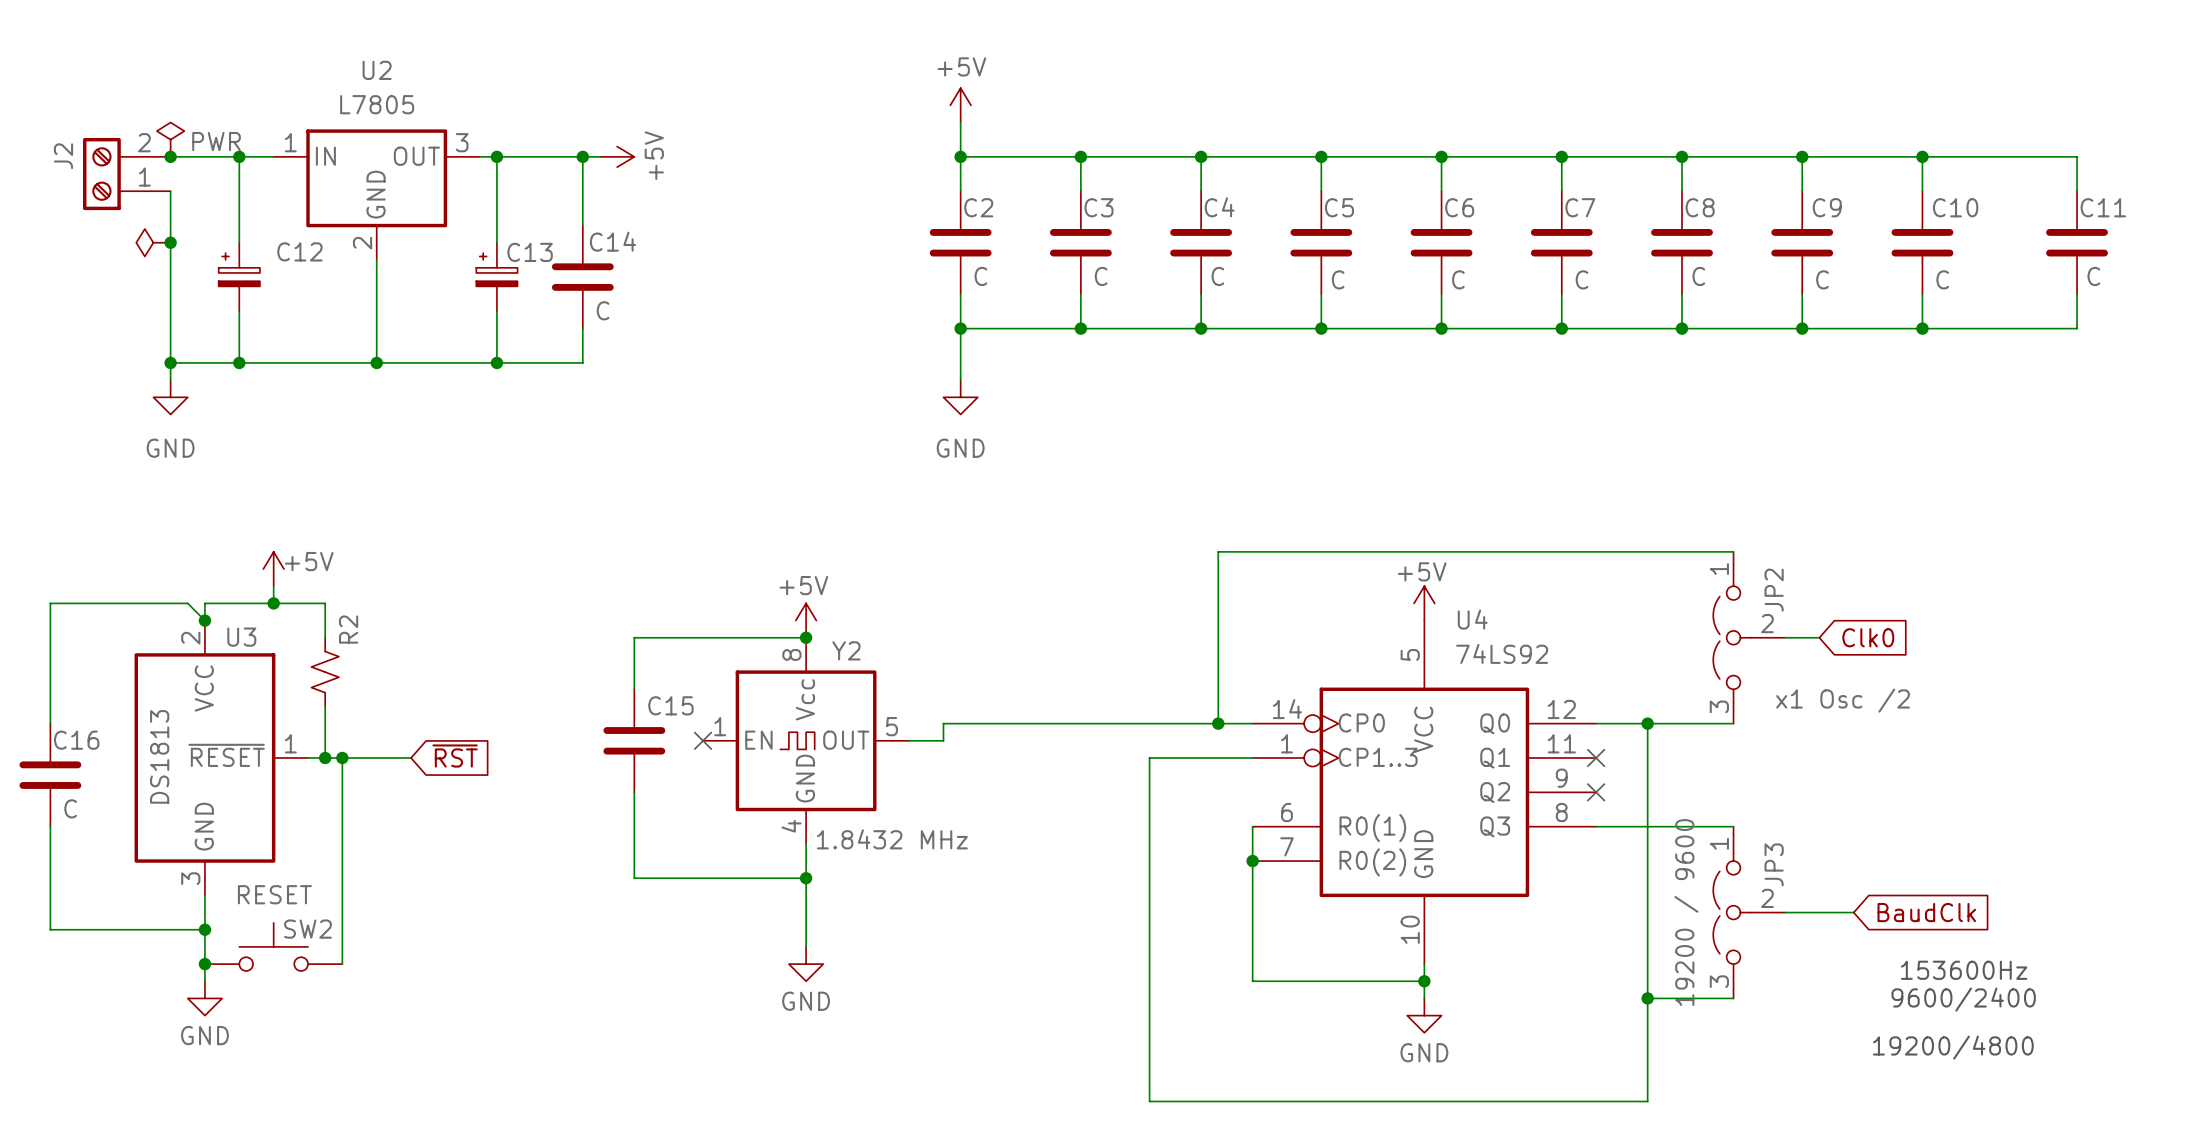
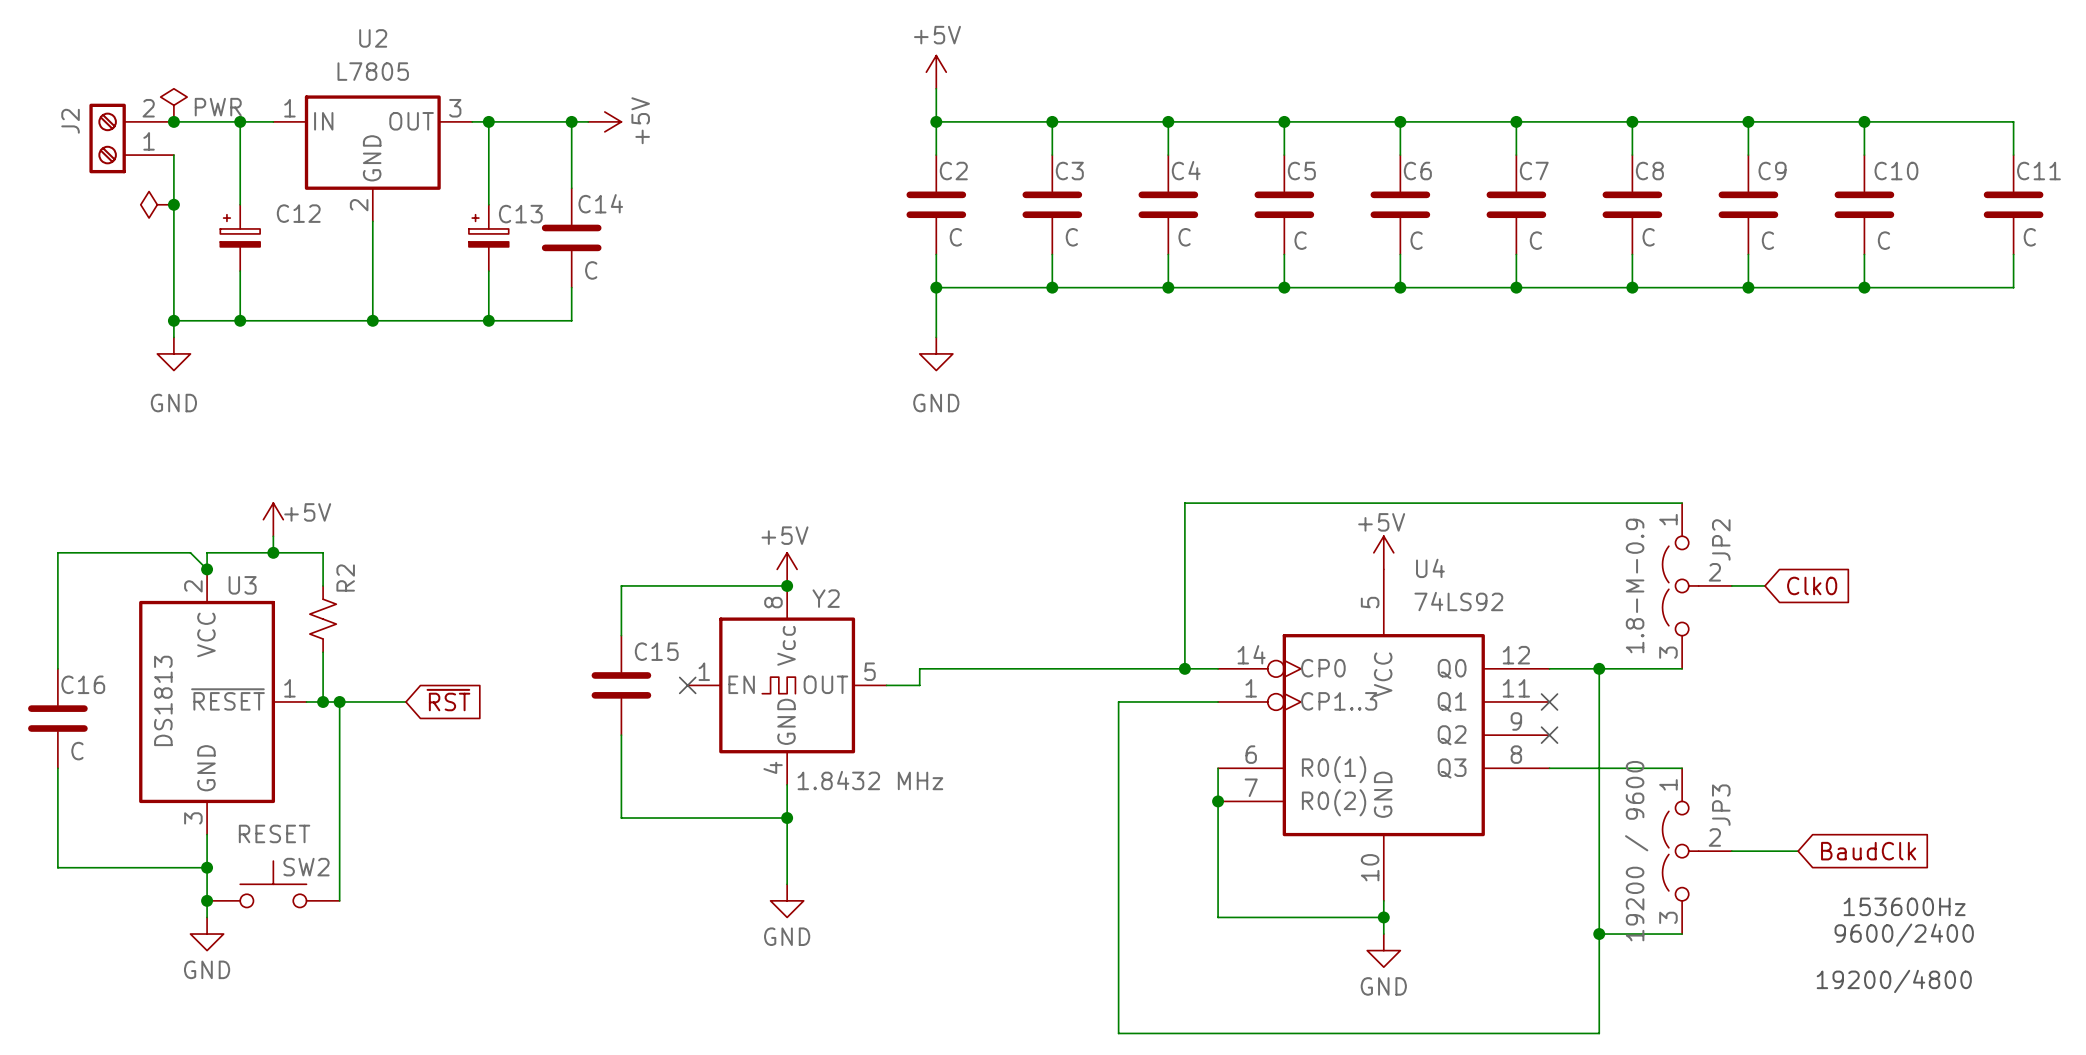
JP2 value: x1 Osc /2 (1843, 700) -> 1.8-M-0.9 (1635, 585)

